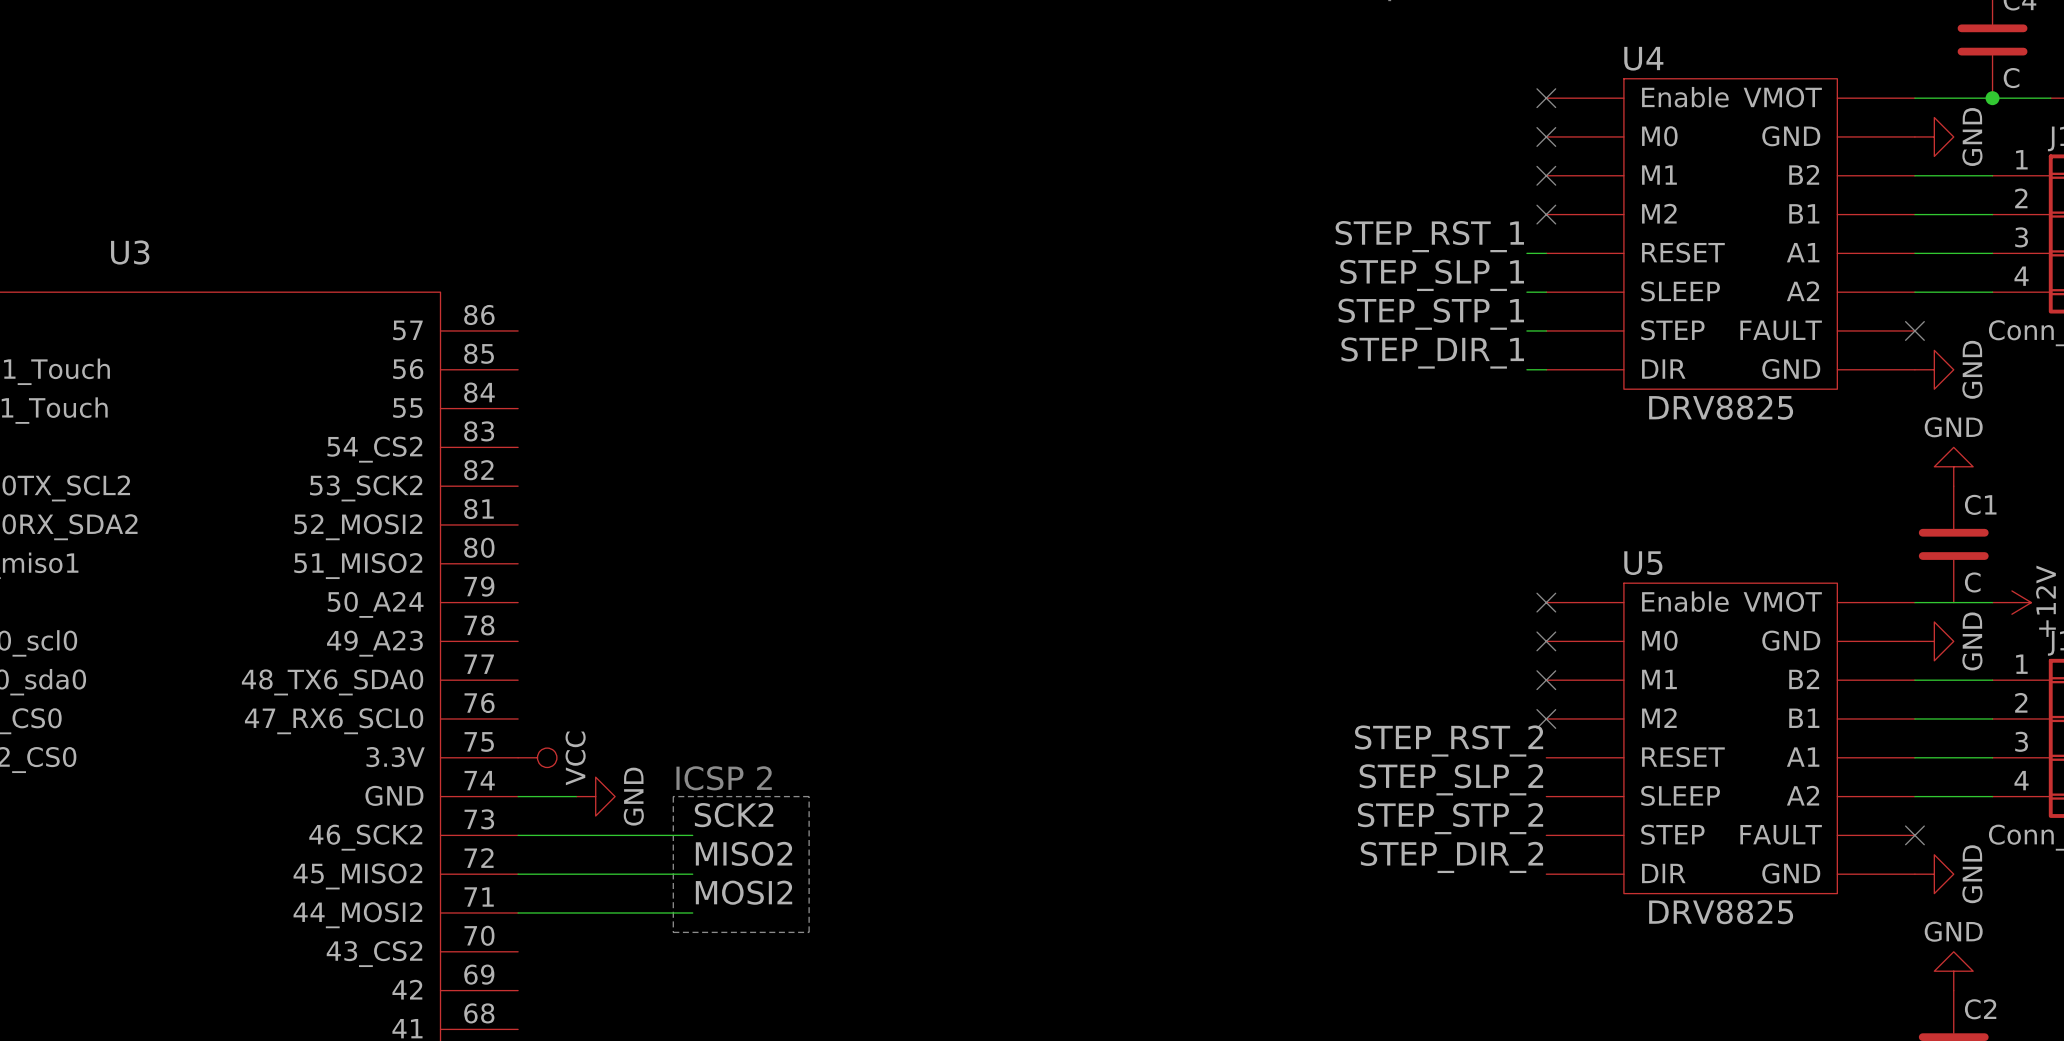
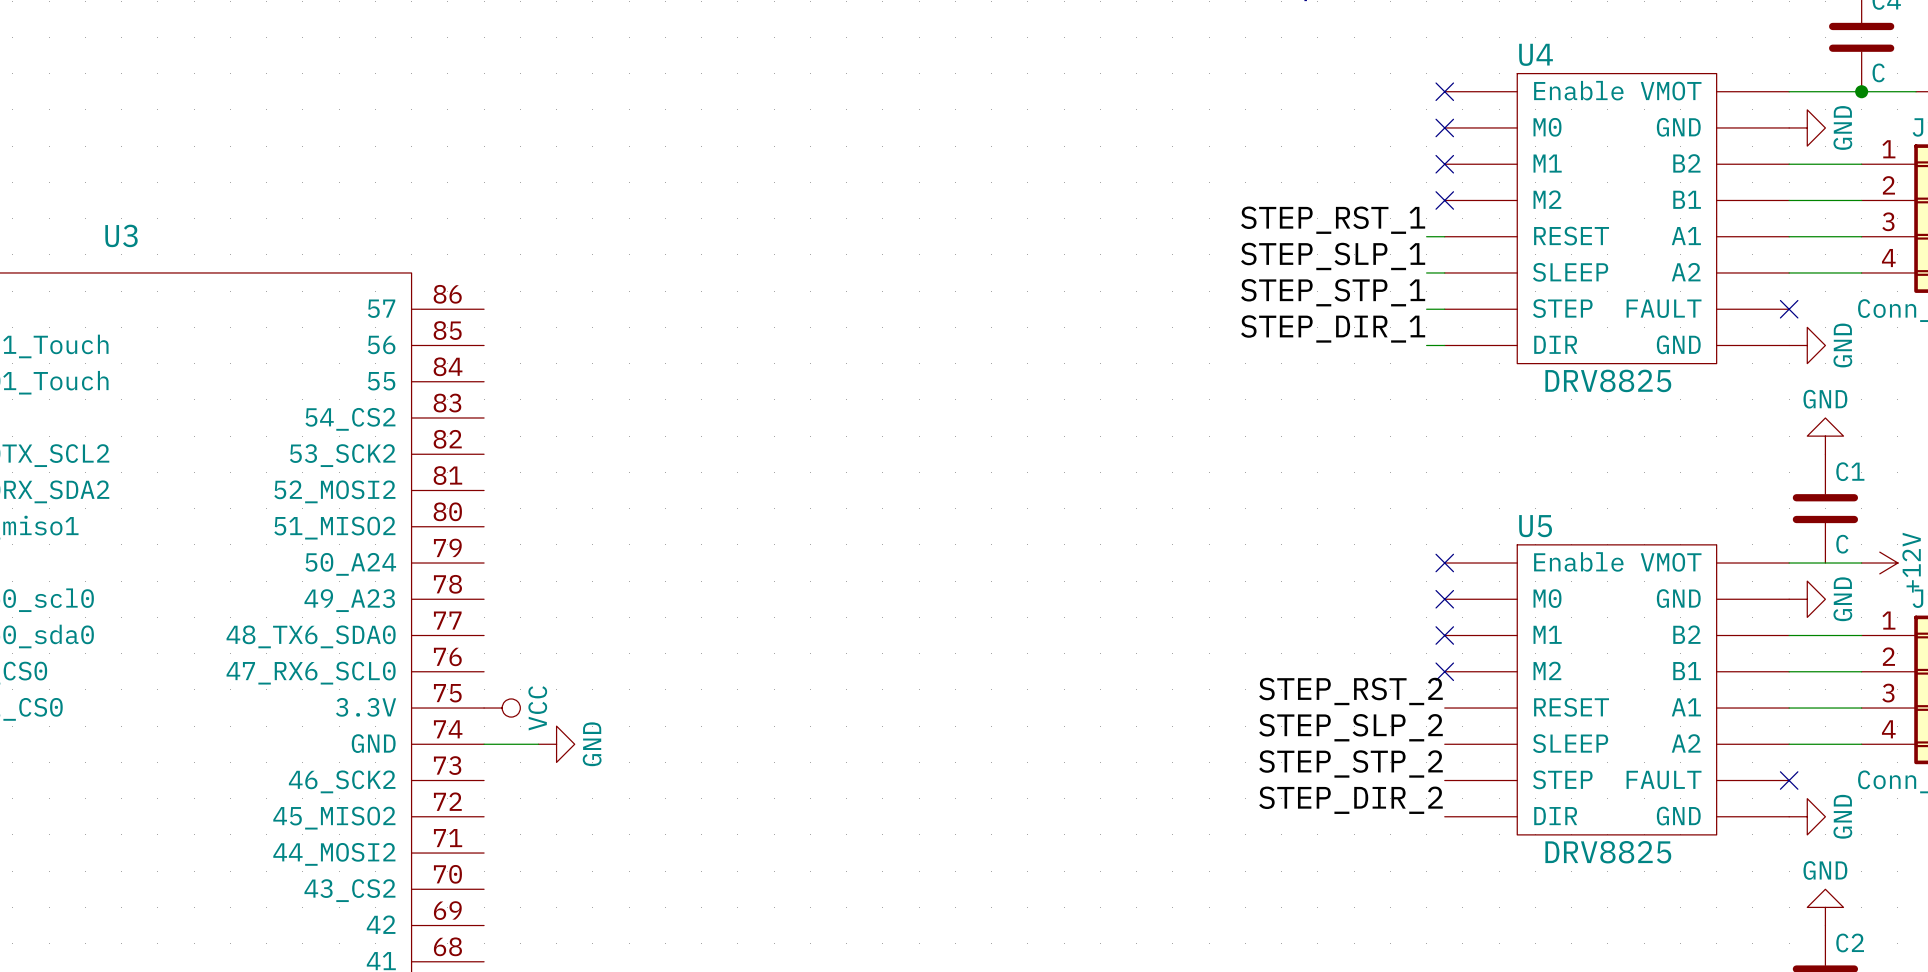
text: ICSP 2 (724, 778) -> none
line: (673, 796) (673, 932) (809, 932) (809, 796) (673, 796) -> none
label: SCK2 (734, 815) -> none
wire: (518, 835) (692, 835) -> none
label: MISO2 (744, 853) -> none
wire: (518, 874) (692, 874) -> none
label: MOSI2 (744, 892) -> none
wire: (518, 912) (692, 912) -> none

